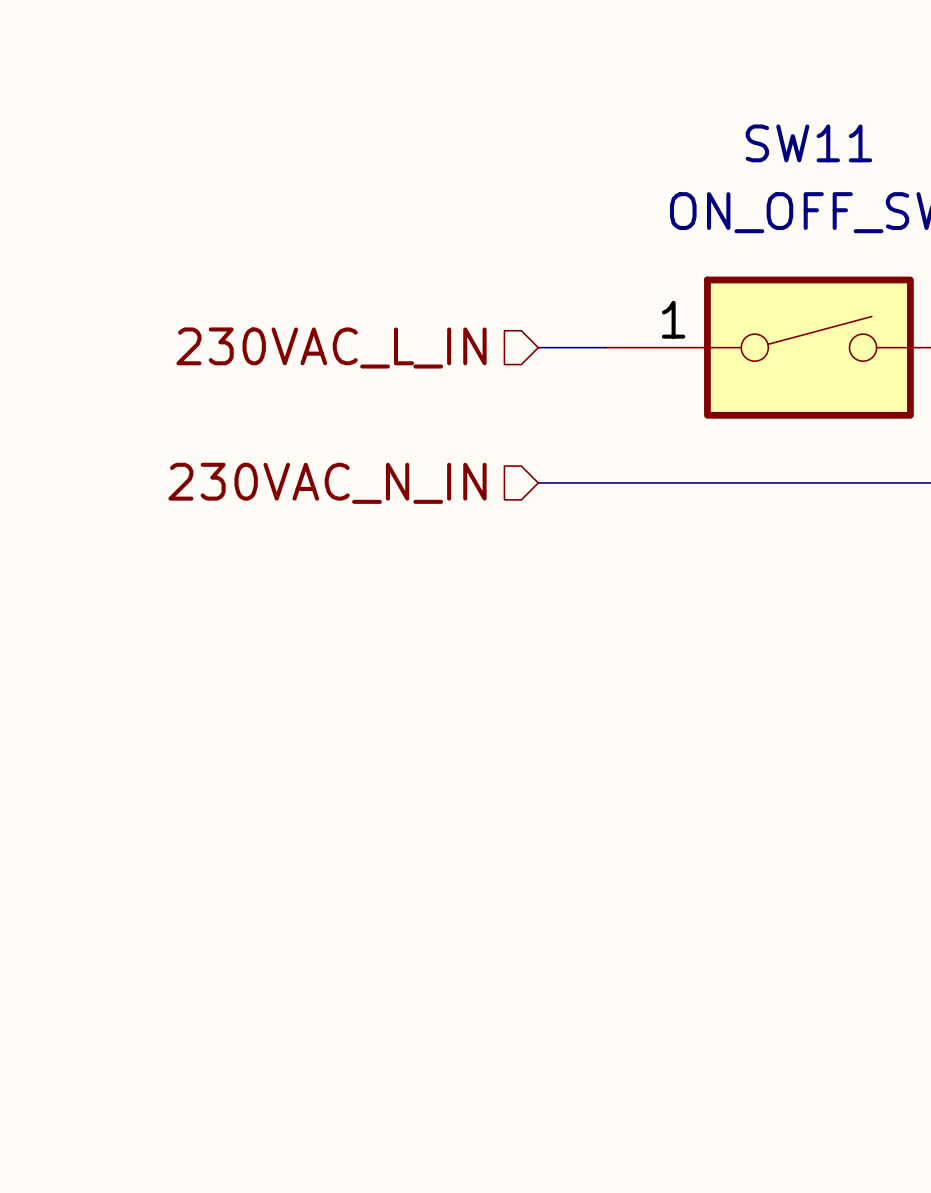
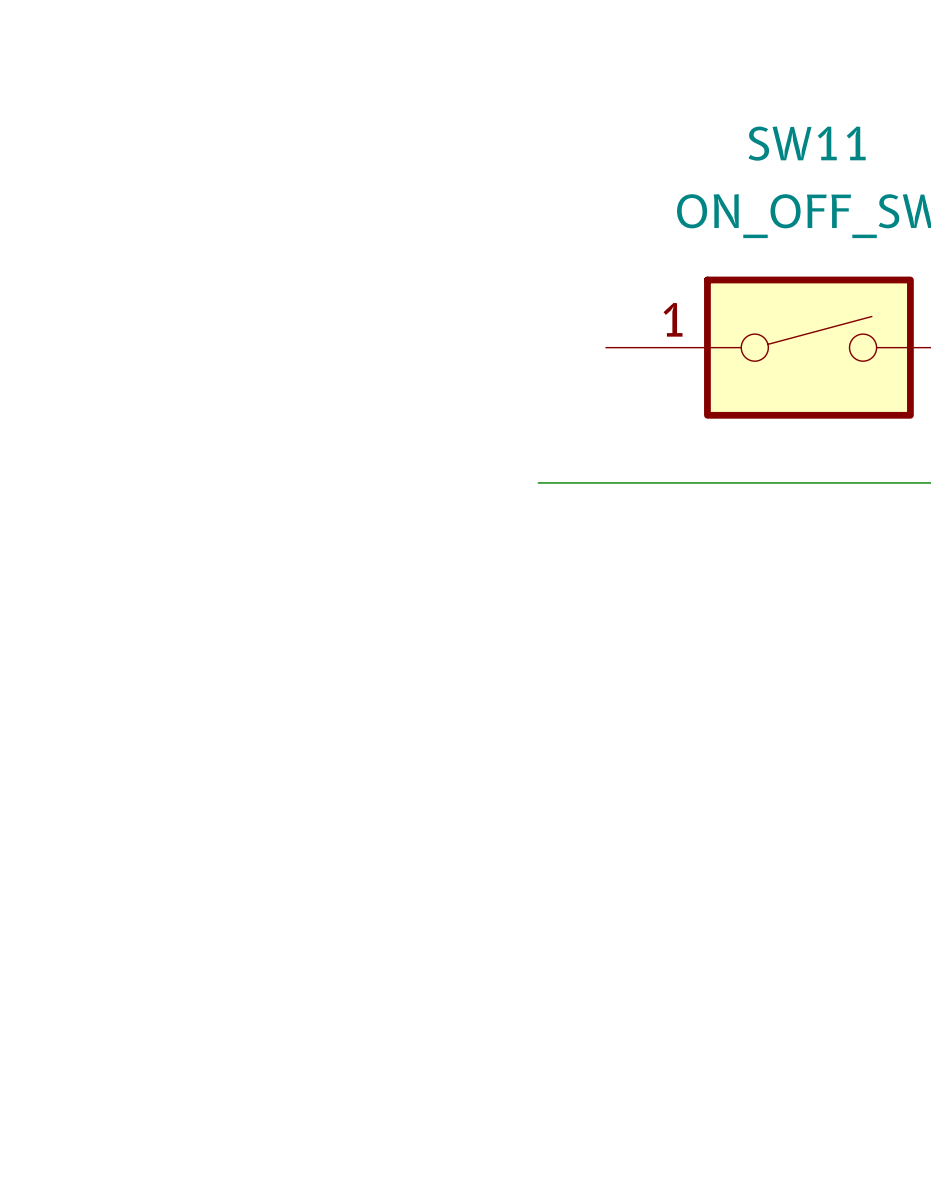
hierarchical label: 230VAC_L_IN (331, 347) -> none
wire: (538, 347) (605, 347) -> none
hierarchical label: 230VAC_N_IN (327, 483) -> none

